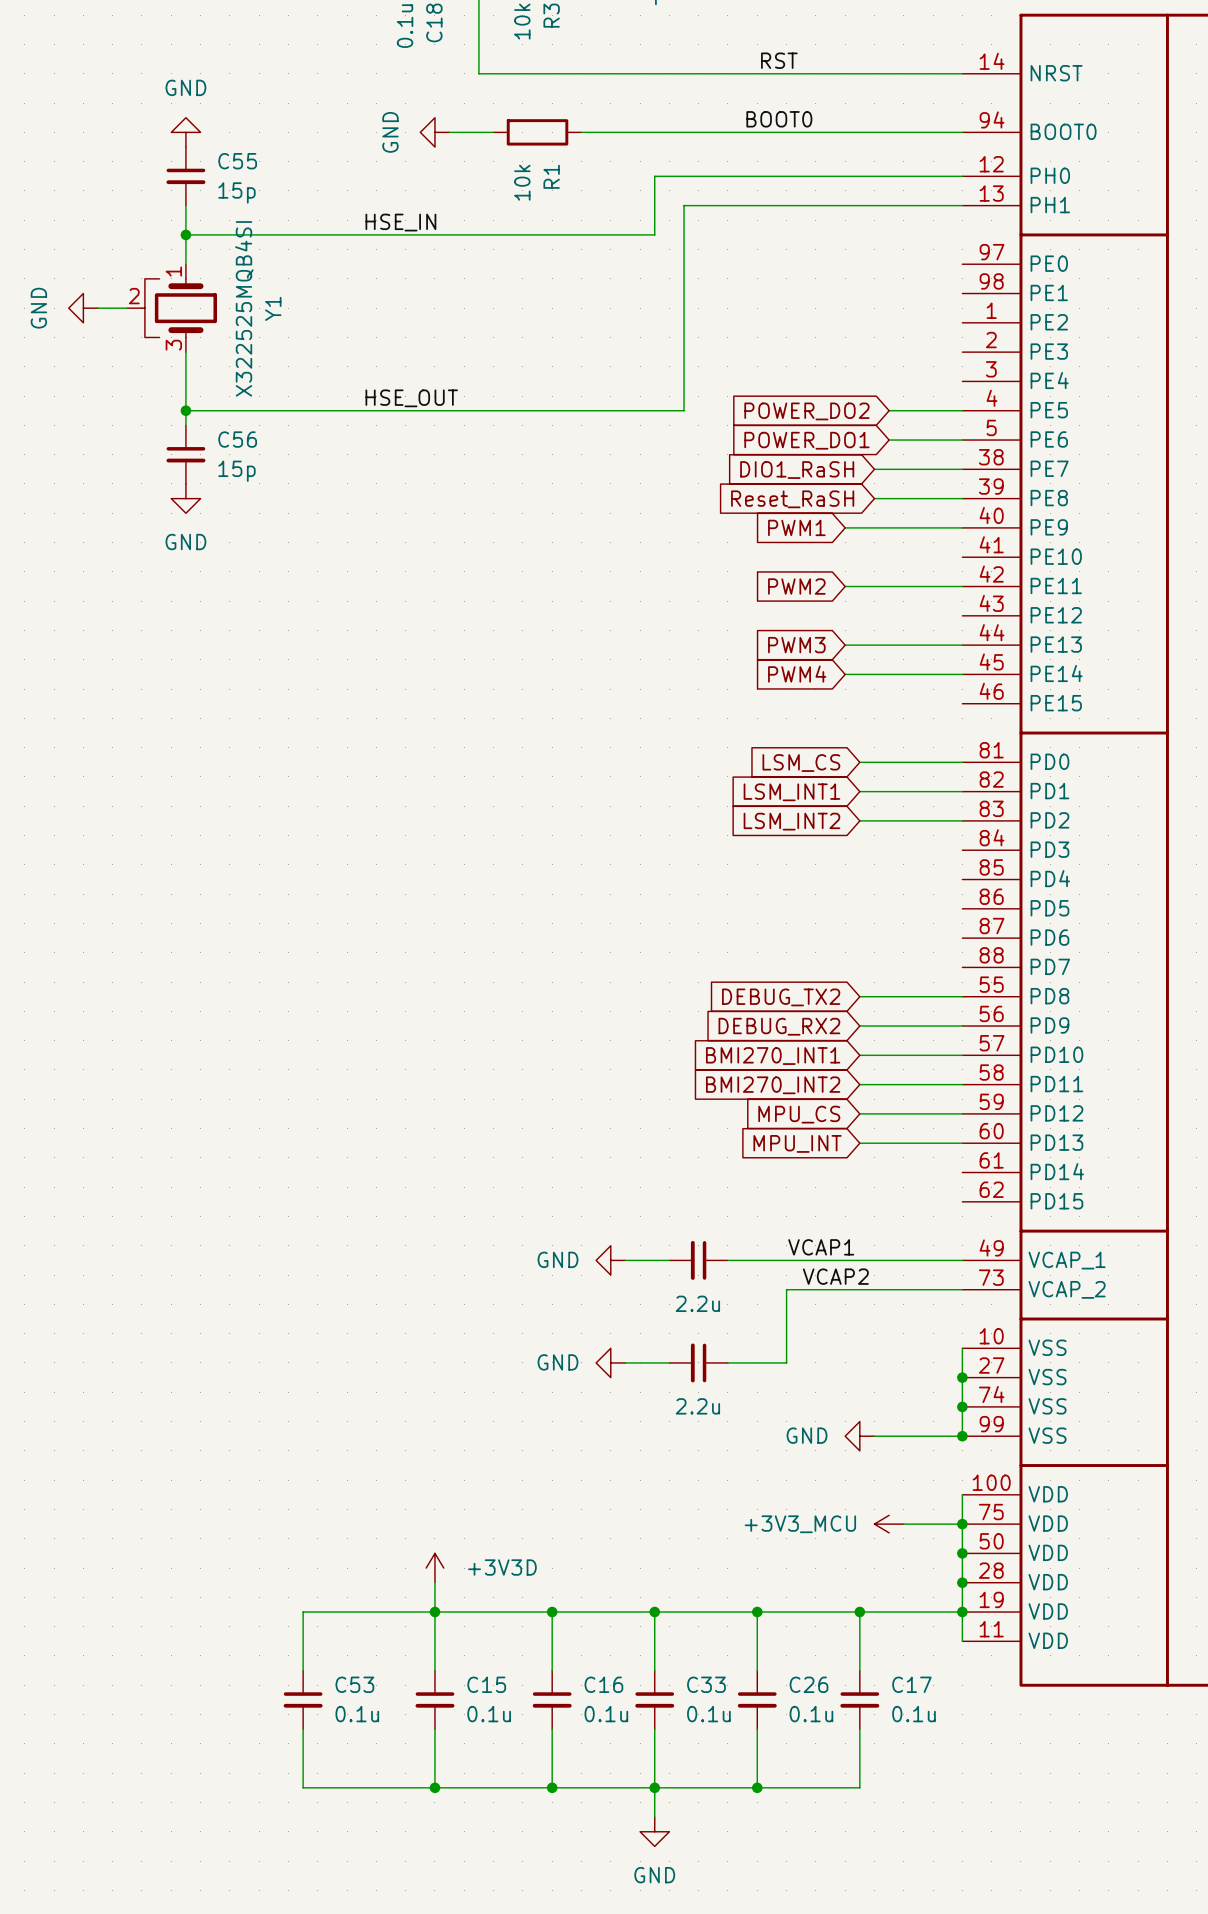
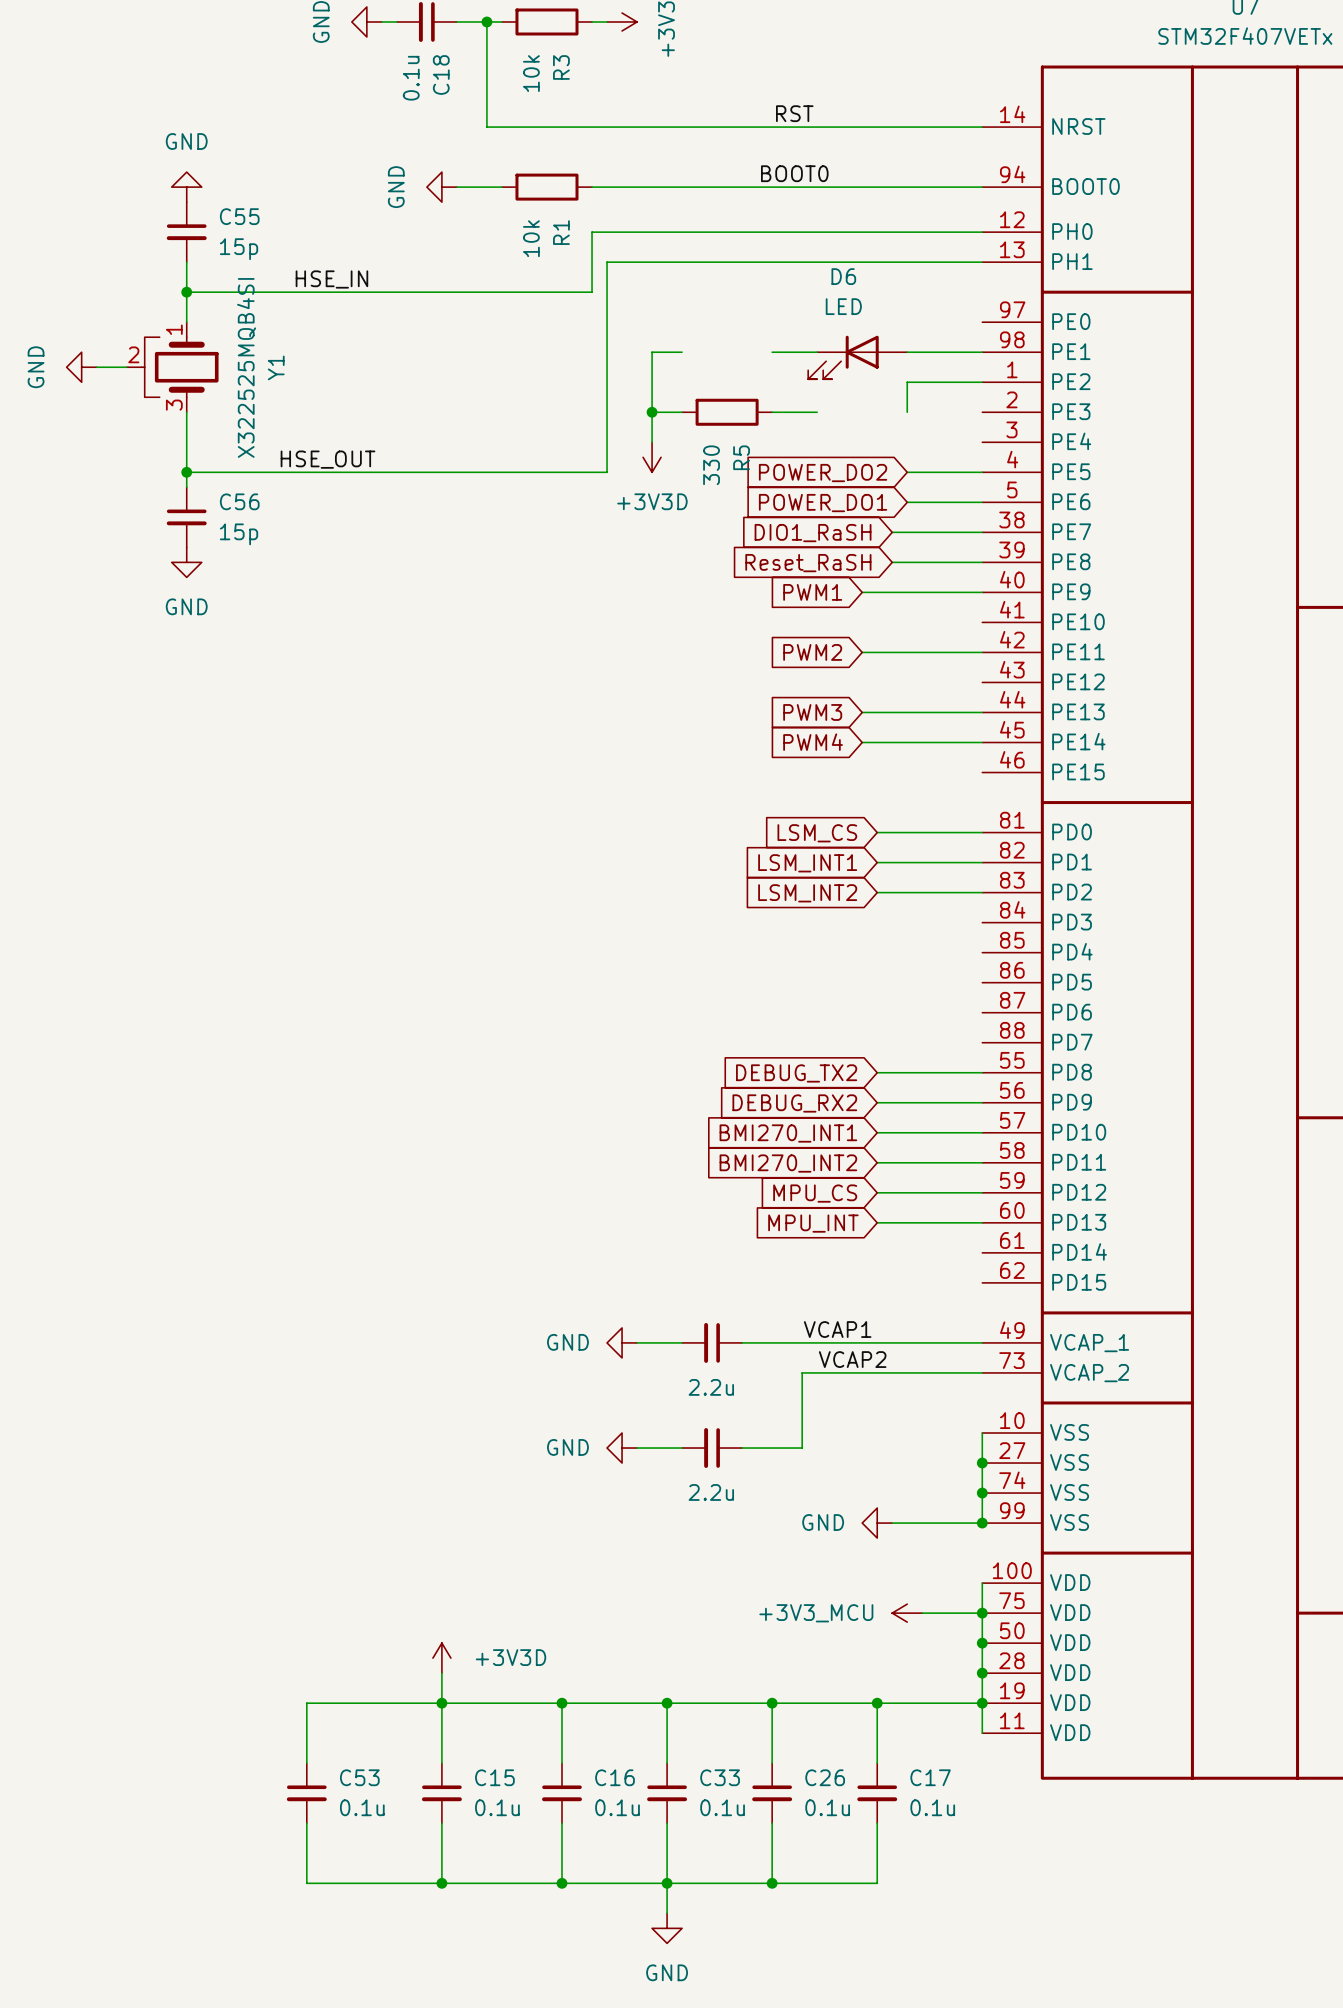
wire: (654, 176) (654, 234) (581, 234) -> (667, 232) (592, 232) (592, 292)
wire: (684, 205) (684, 410) (596, 410) -> (697, 262) (607, 262) (607, 472)
label position: HSE_IN (400, 222) -> HSE_IN (331, 279)
wire: none -> (682, 352) (652, 352) (652, 442)
wire: none -> (772, 352) (817, 352)
wire: none -> (907, 352) (982, 352)
D6: none -> LED (857, 357)
wire: none -> (982, 382) (907, 382) (907, 412)
wire: none -> (652, 412) (682, 412)
junction: none -> (652, 412)
R5: none -> 330 (727, 412)
wire: none -> (772, 412) (817, 412)
power symbol: none -> +3V3D (652, 457)
label position: HSE_OUT (411, 398) -> HSE_OUT (328, 459)

